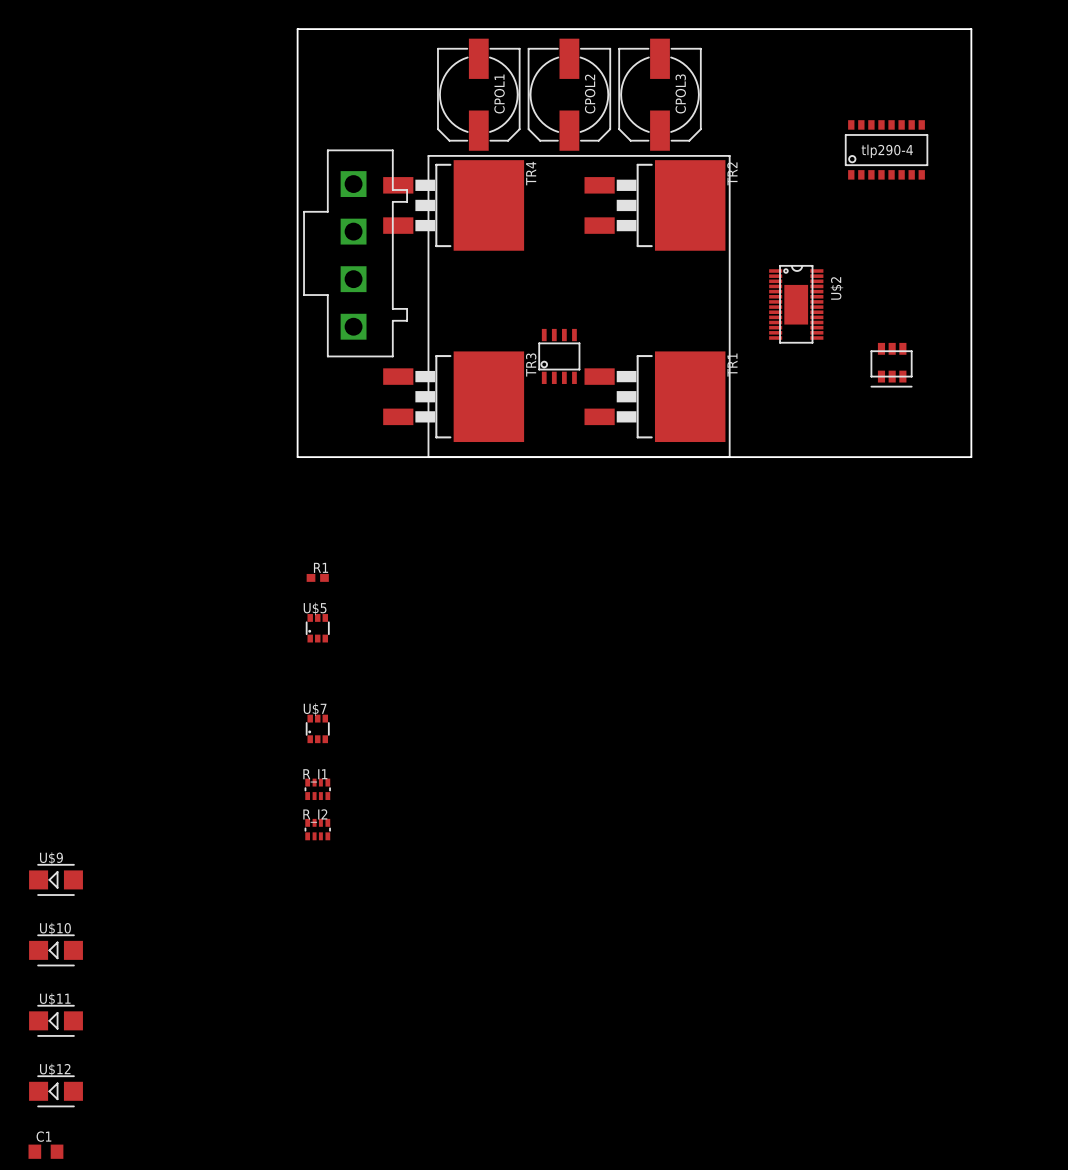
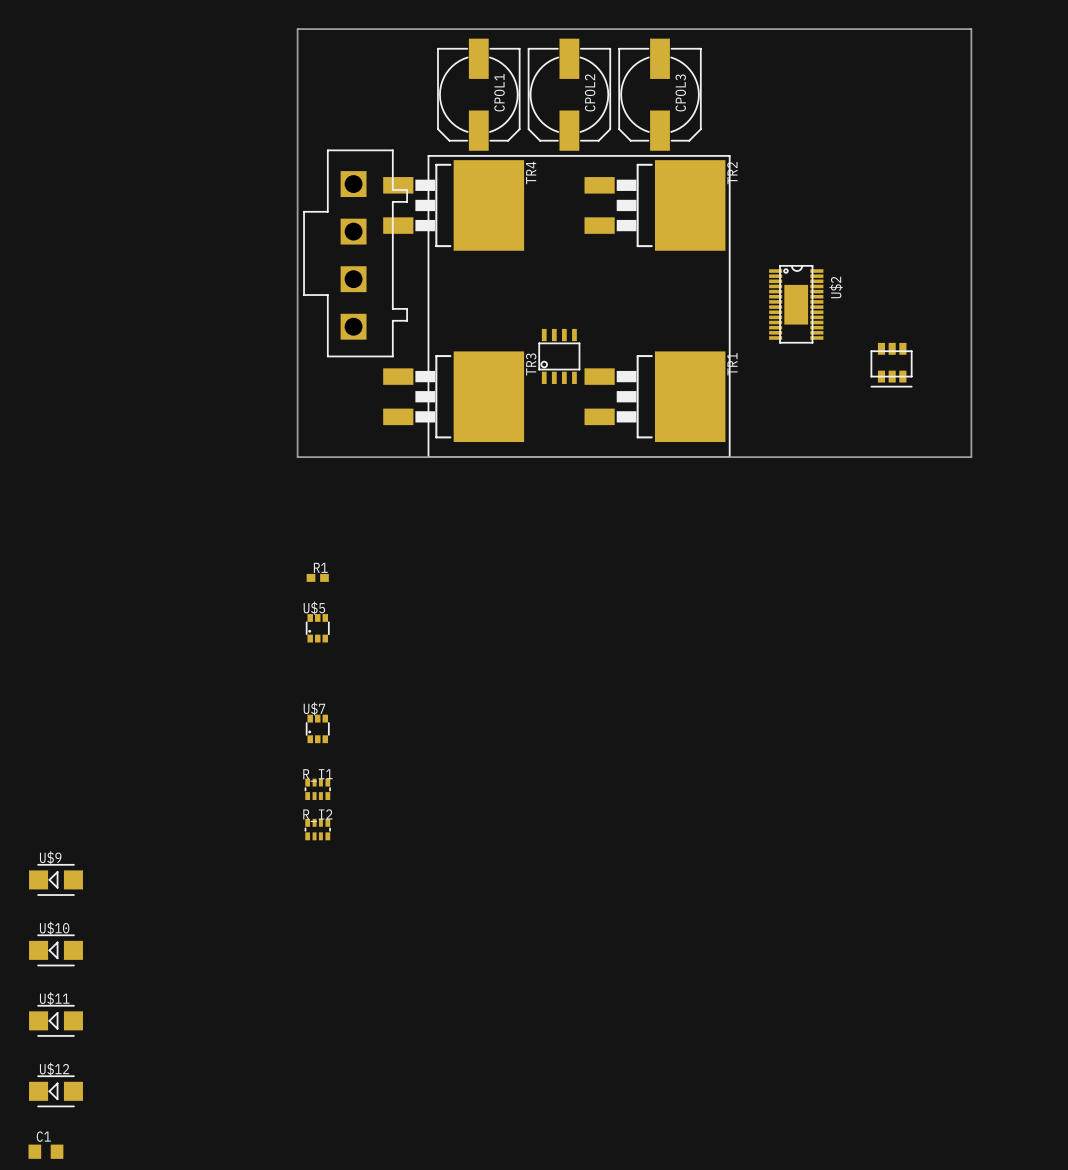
part: (886, 149) -> none

